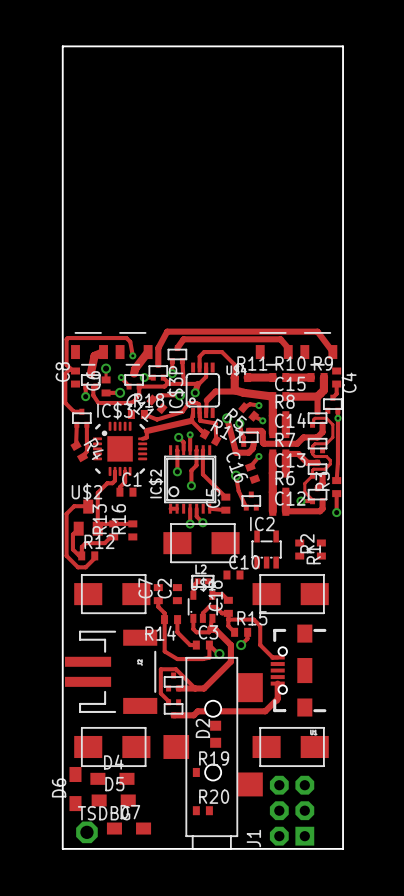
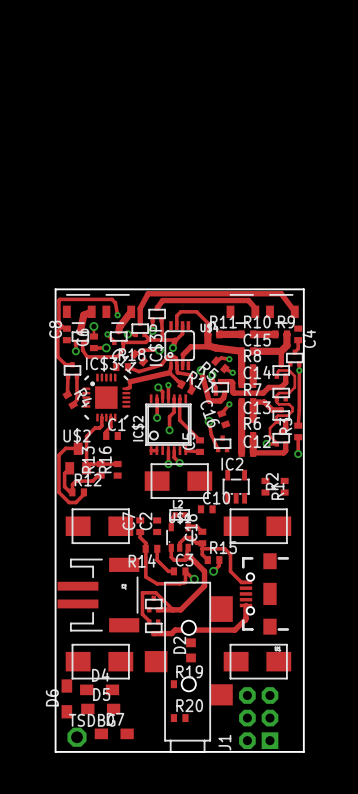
board edge: (62, 326) (62, 46) (343, 46) (343, 326) -> (55, 289) (303, 289)

